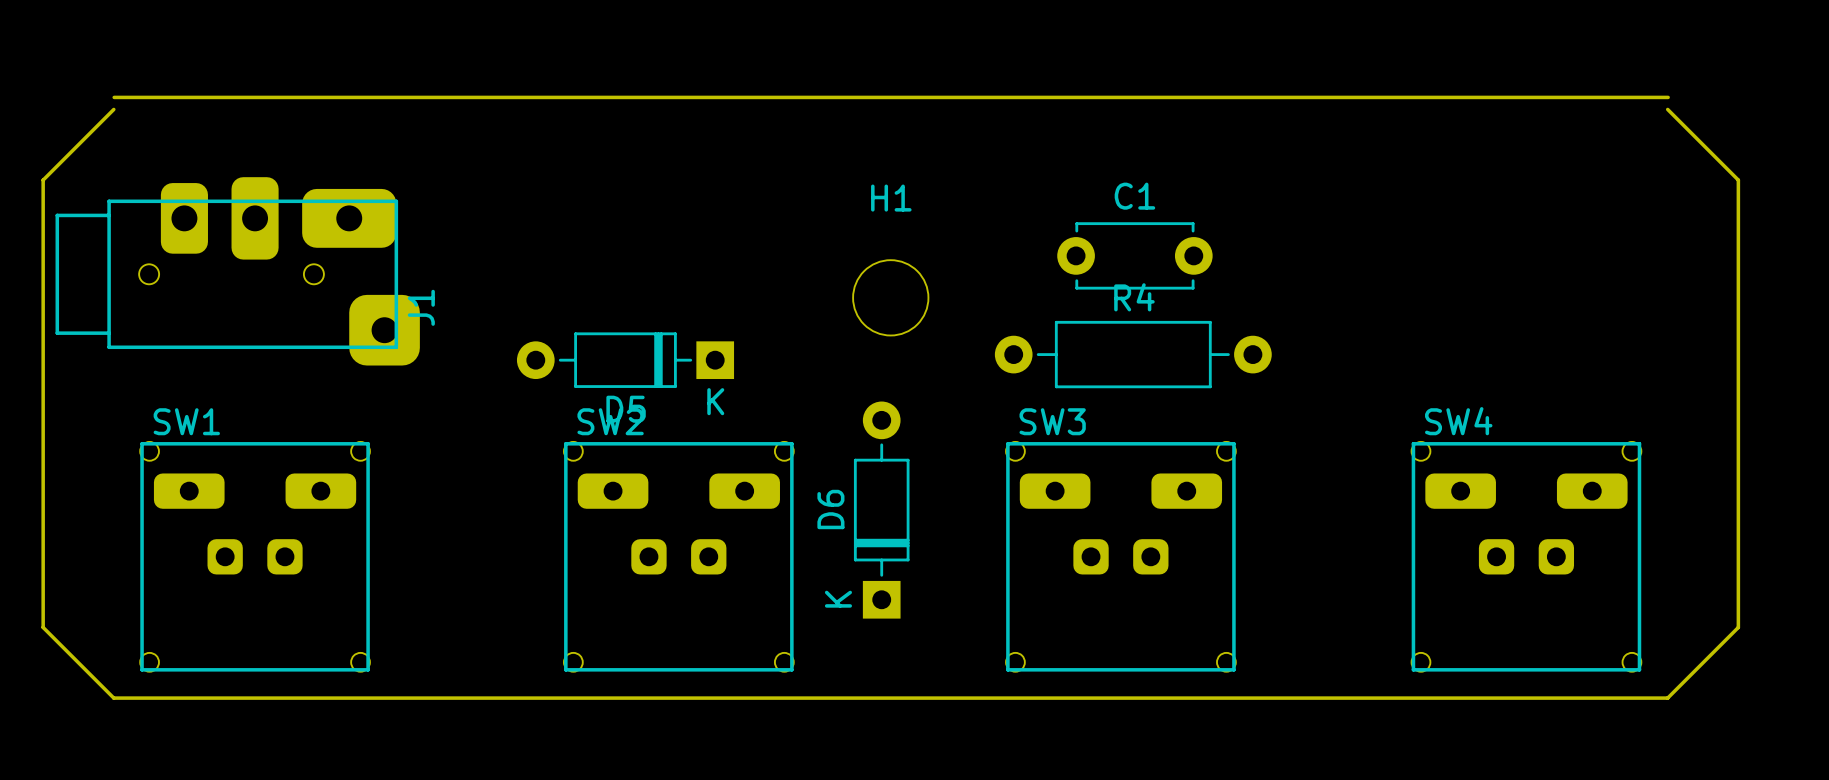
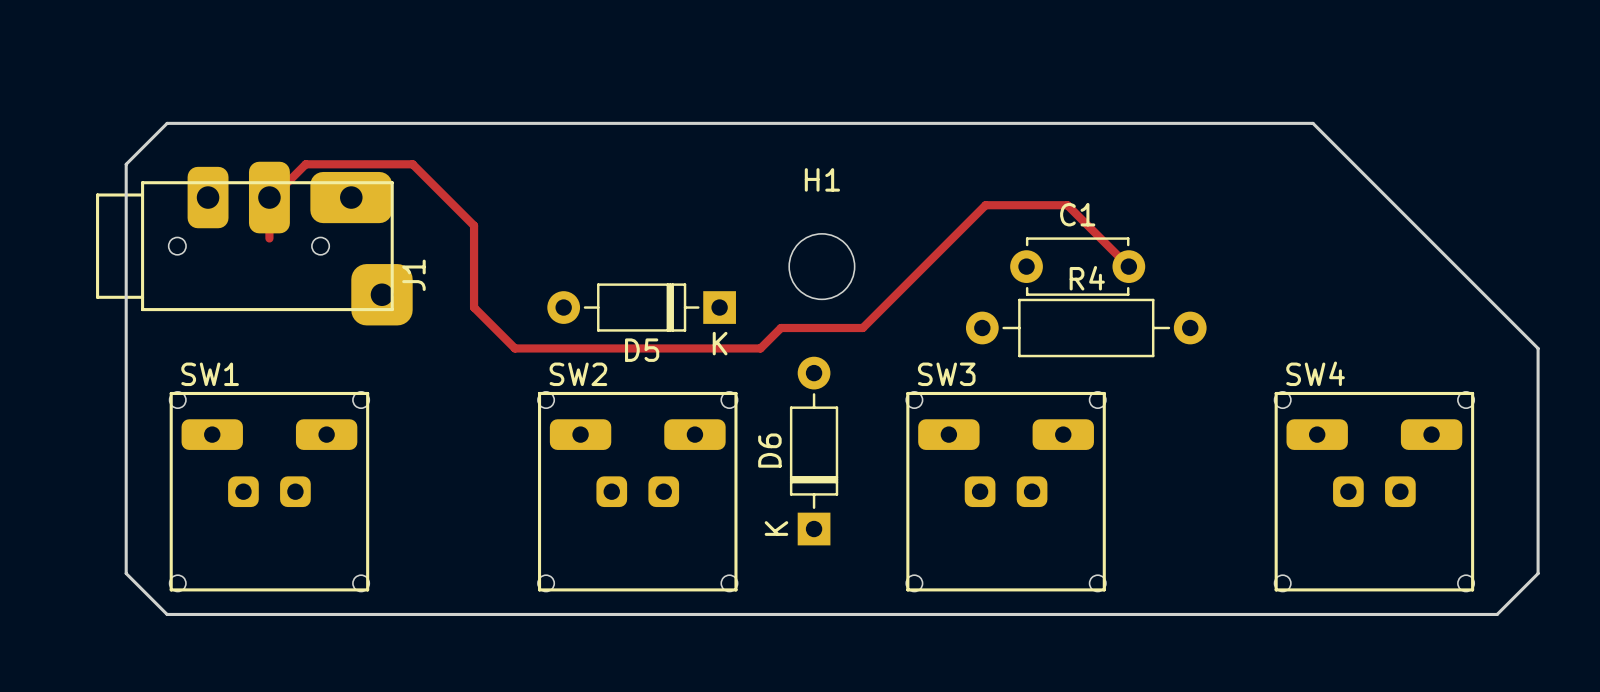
board edge: (114, 97) (1668, 97) -> none
board edge: (113, 109) (43, 180) (43, 627) (113, 698) (137, 698) -> none
board edge: (1667, 109) (1738, 180) (1738, 627) (1714, 650) -> (167, 614) (126, 573) (126, 164) (167, 123) (1313, 123) (1538, 348) (1538, 573)
C1 position: (1134, 255) -> (1077, 266)
track: none -> (269, 238) (269, 200) (305, 164) (412, 164) (474, 225) (474, 307) (514, 348) (760, 348) (780, 327) (862, 327) (985, 205) (1067, 205) (1128, 266)
R4 position: (1133, 354) -> (1086, 327)
D5 position: (625, 360) -> (641, 307)
SW3 position: (1120, 556) -> (1006, 491)

